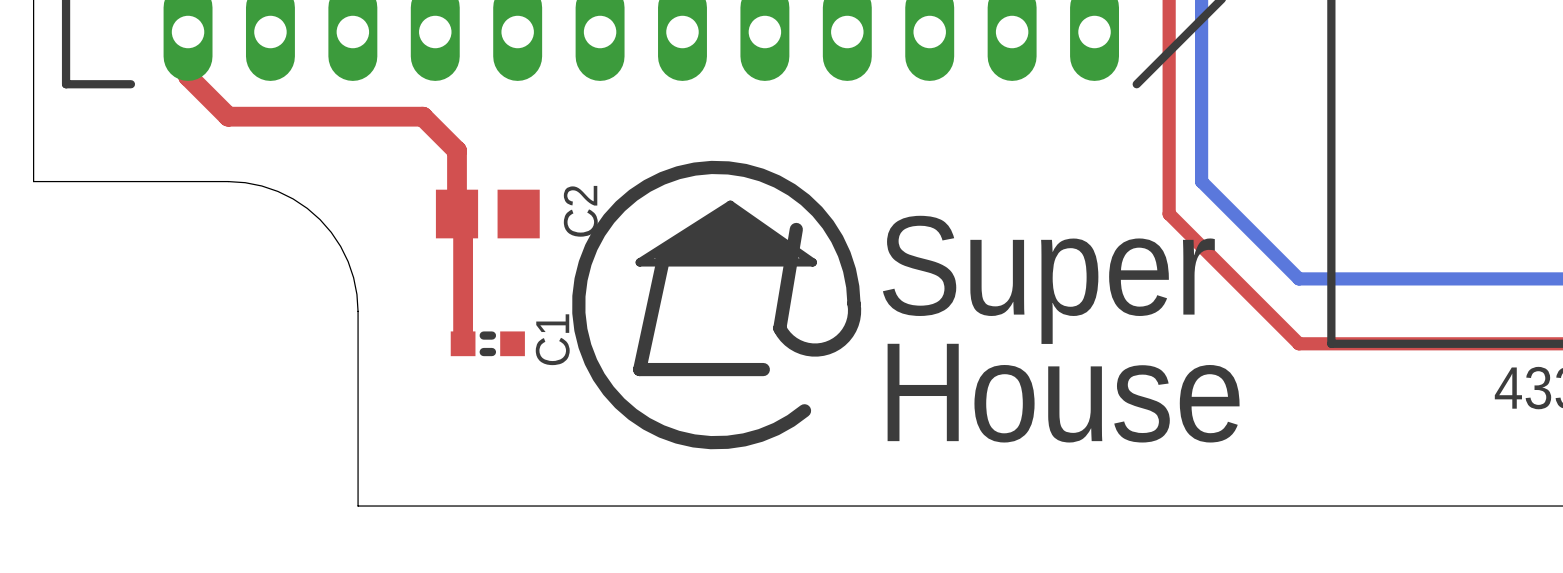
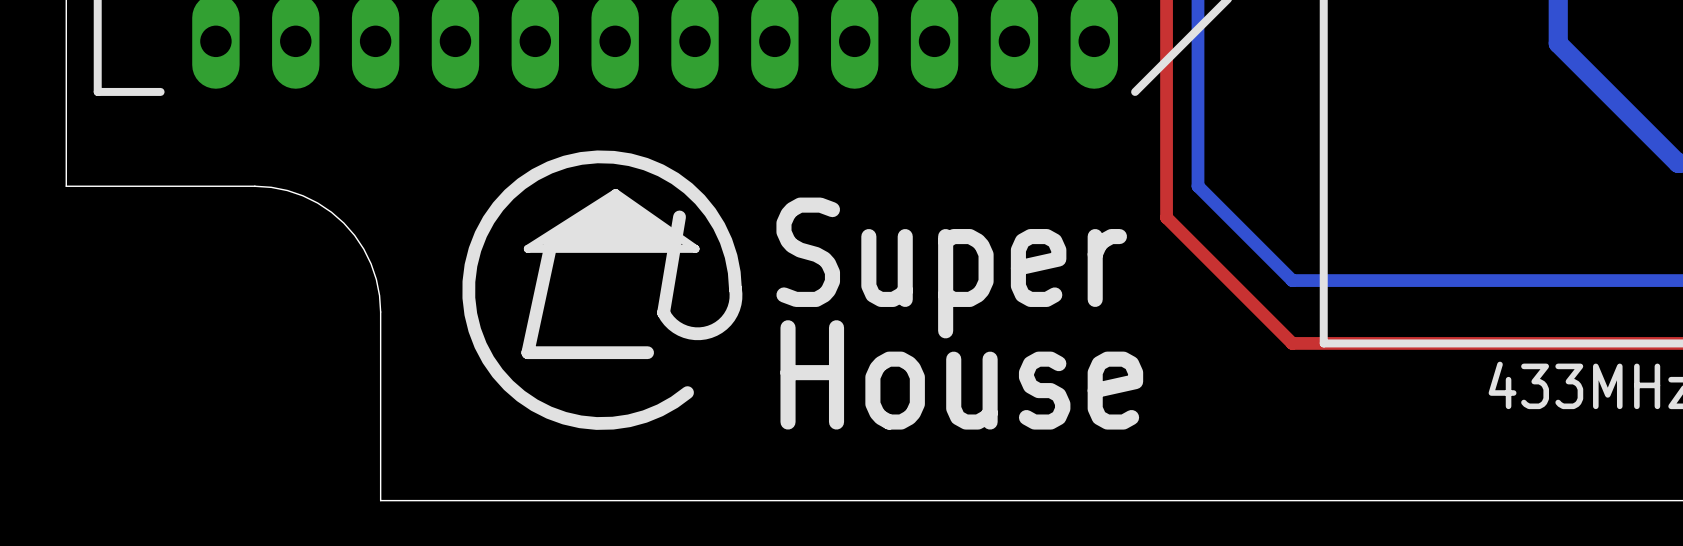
top track: (188, 32) (188, 76) (228, 116) (422, 116) (457, 150) (457, 214) (463, 220) (463, 343) -> none
line: (730, 204) (639, 262) (812, 262) (730, 204) -> (615, 192) (527, 248) (695, 248) (615, 192)
C2: (487, 214) -> none
line: (730, 229) (713, 237) (755, 237) (730, 221) (680, 245) (771, 245) -> (615, 216) (599, 224) (639, 224) (615, 208) (567, 232) (655, 232)
line: (796, 229) (779, 328) (789, 340) (802, 347) (812, 349) (827, 348) (844, 336) (850, 328) (854, 313) (849, 270) (837, 238) (817, 211) (791, 189) (761, 174) (728, 167) (711, 167) (678, 172) (647, 185) (620, 206) (609, 218) (591, 247) (581, 279) (578, 313) (584, 346) (590, 361) (608, 390) (632, 414) (661, 431) (677, 437) (710, 442) (744, 439) (776, 429) (804, 410) -> (679, 216) (663, 312) (672, 324) (685, 331) (695, 333) (709, 331) (726, 321) (731, 312) (735, 298) (731, 256) (719, 226) (699, 199) (675, 178) (645, 164) (613, 157) (597, 156) (565, 161) (535, 174) (509, 194) (498, 206) (480, 234) (470, 265) (468, 297) (474, 330) (480, 345) (497, 373) (520, 396) (549, 412) (564, 418) (596, 423) (629, 420) (660, 410) (687, 392)
line: (656, 254) (788, 254) (730, 212) (664, 254) (639, 369) (763, 369) -> (543, 240) (671, 240) (615, 200) (551, 240) (527, 352) (647, 352)
text position: Super (1048, 279) -> Super (951, 267)
C1: (487, 343) -> none
text position: House (1063, 393) -> House (961, 374)

